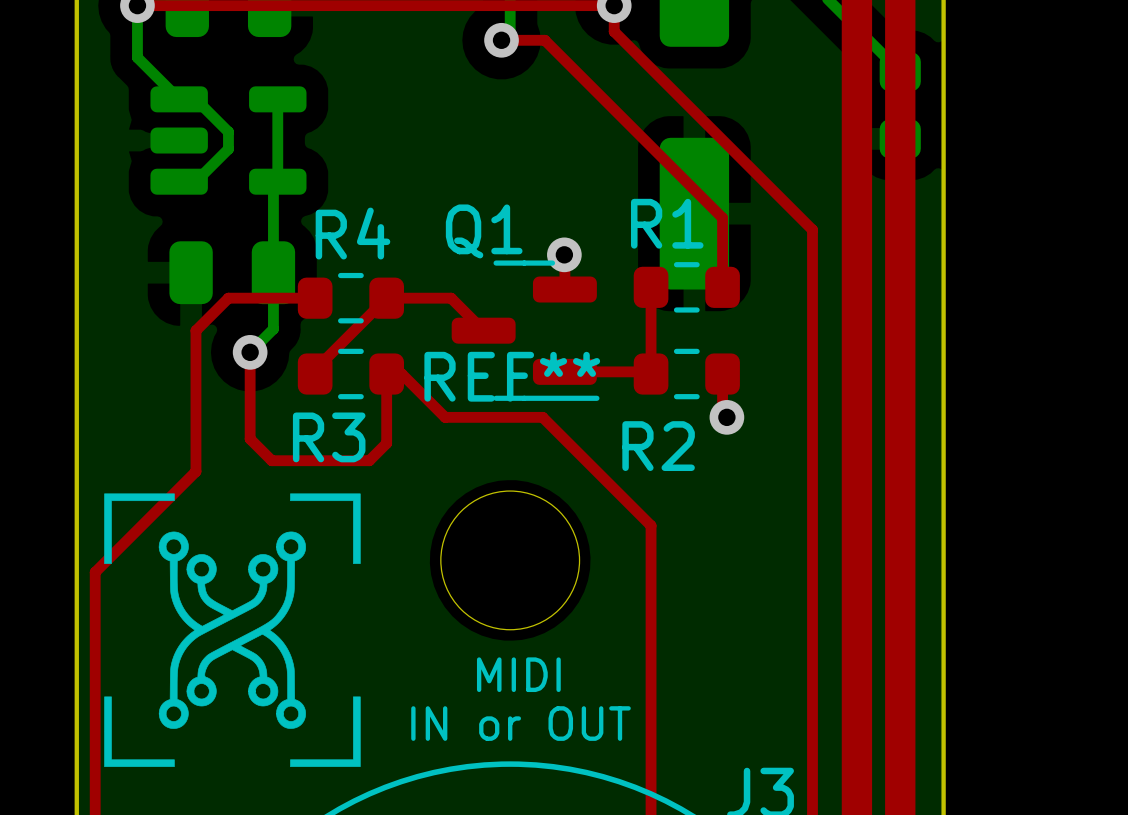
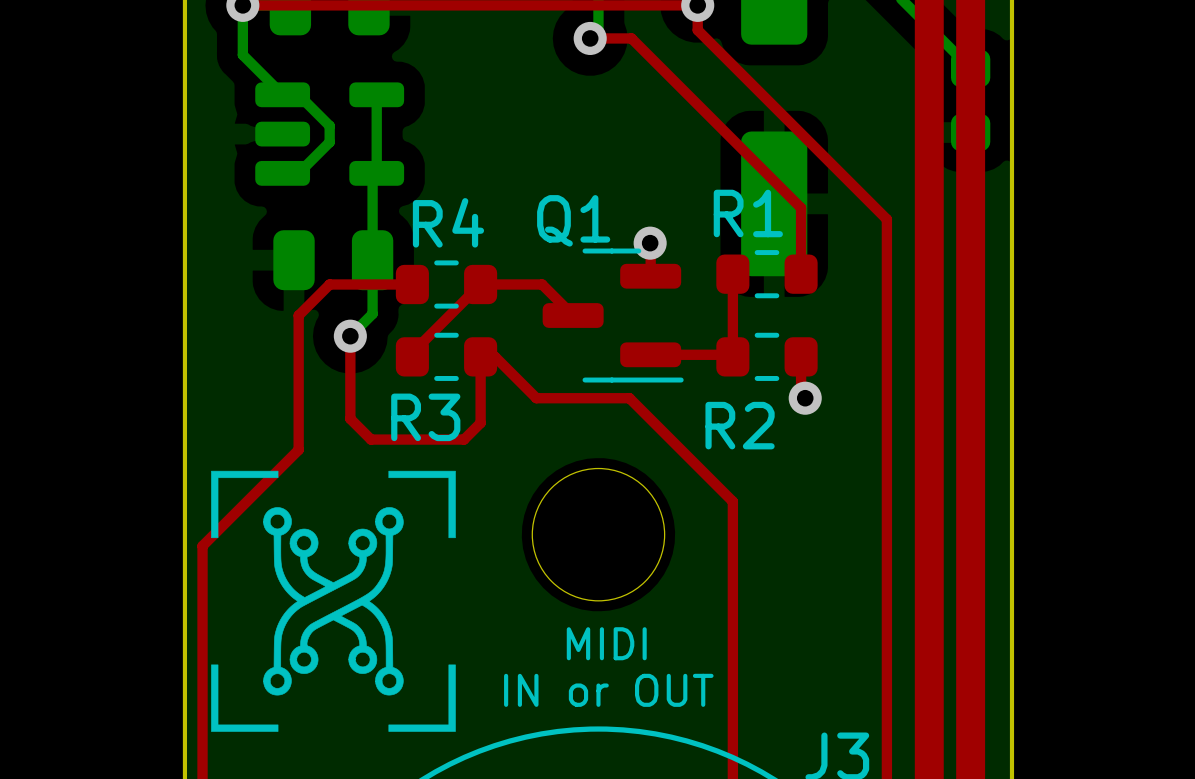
REF** name: REF** (512, 376) -> none

